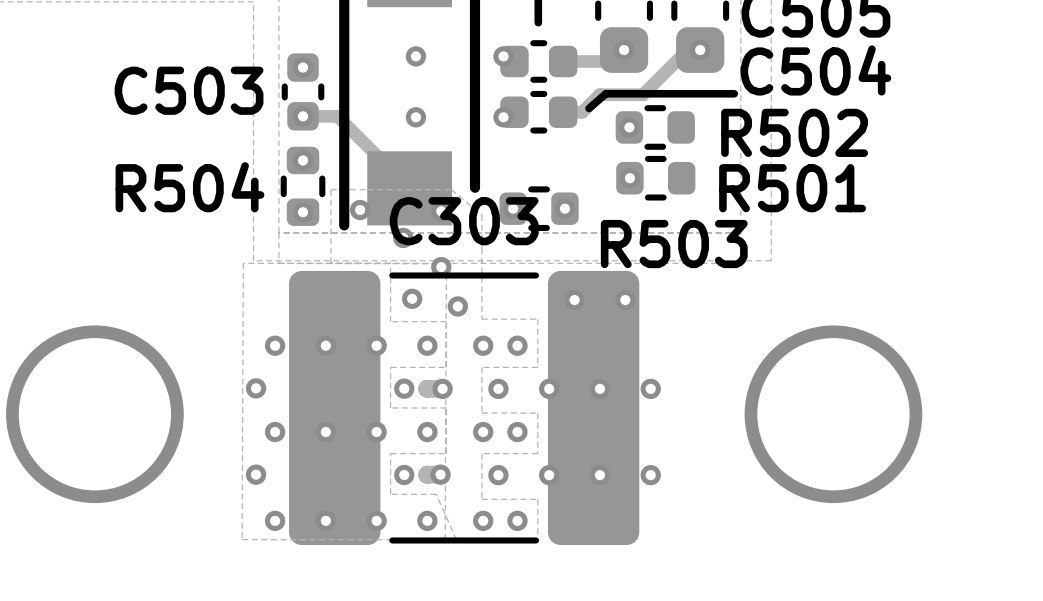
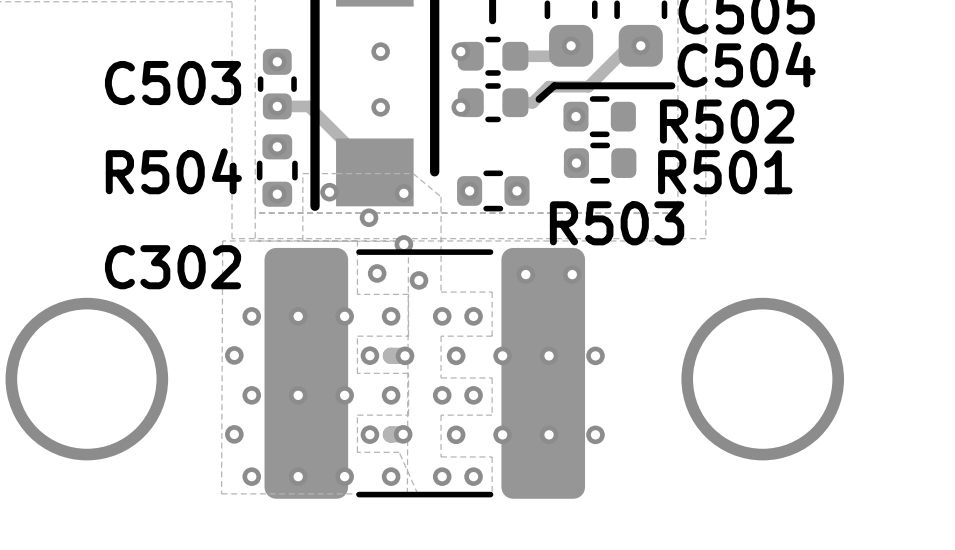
C303 name: C303 (464, 221) -> C302 (173, 267)

